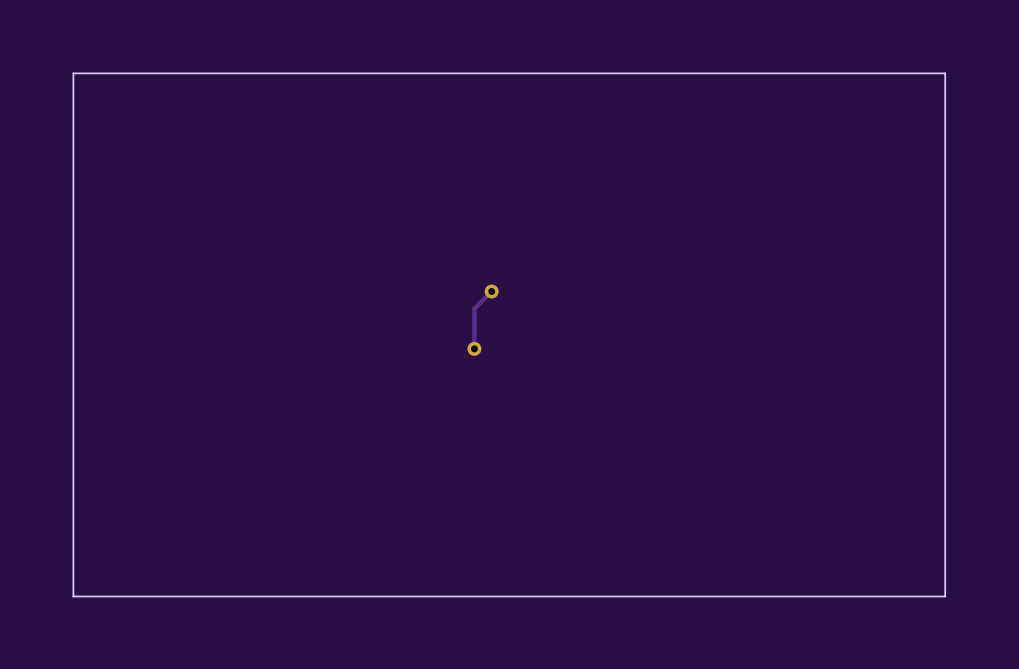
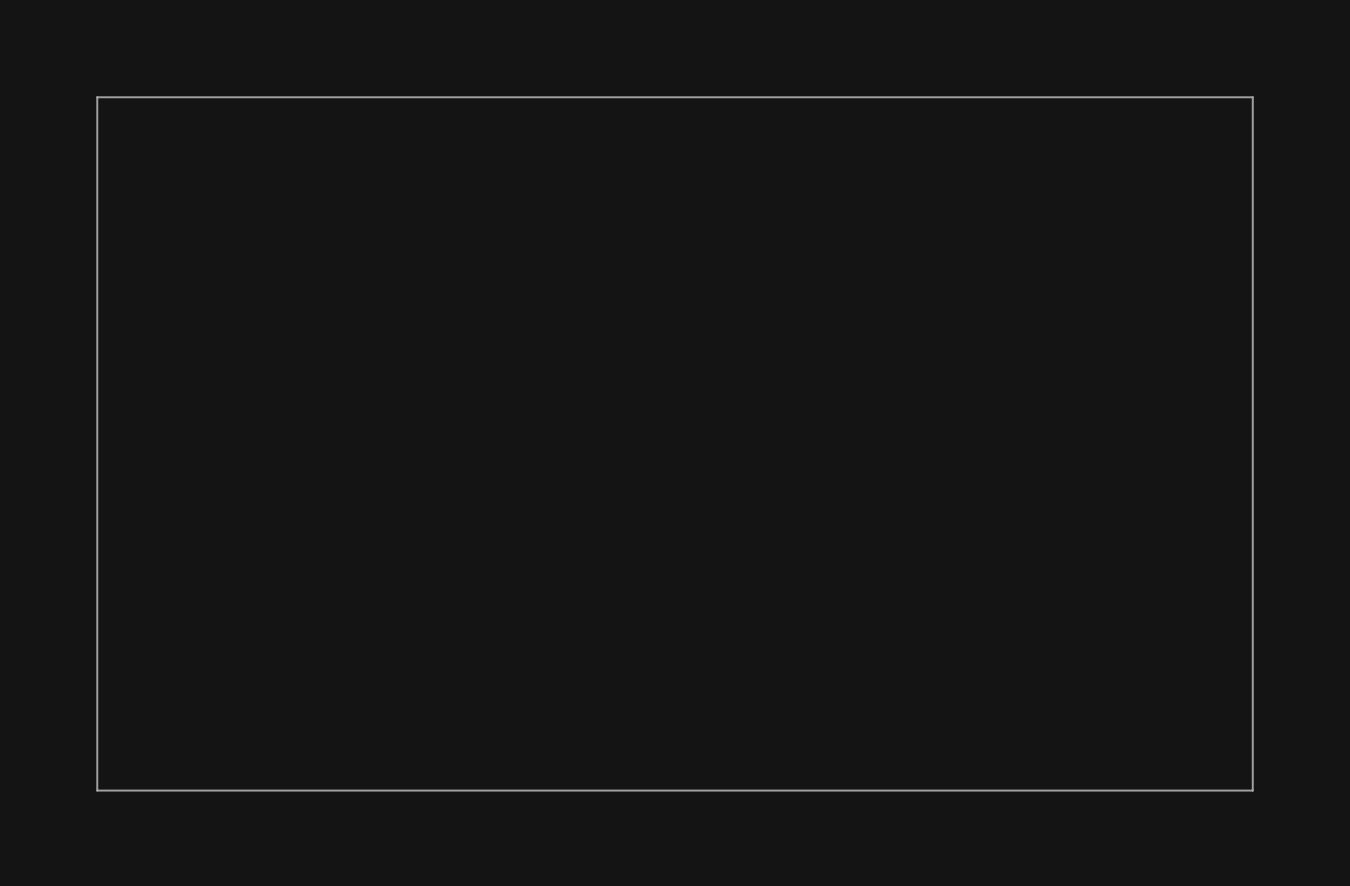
track: (491, 291) (474, 308) (474, 348) -> none
via: (491, 291) -> none
via: (474, 348) -> none

